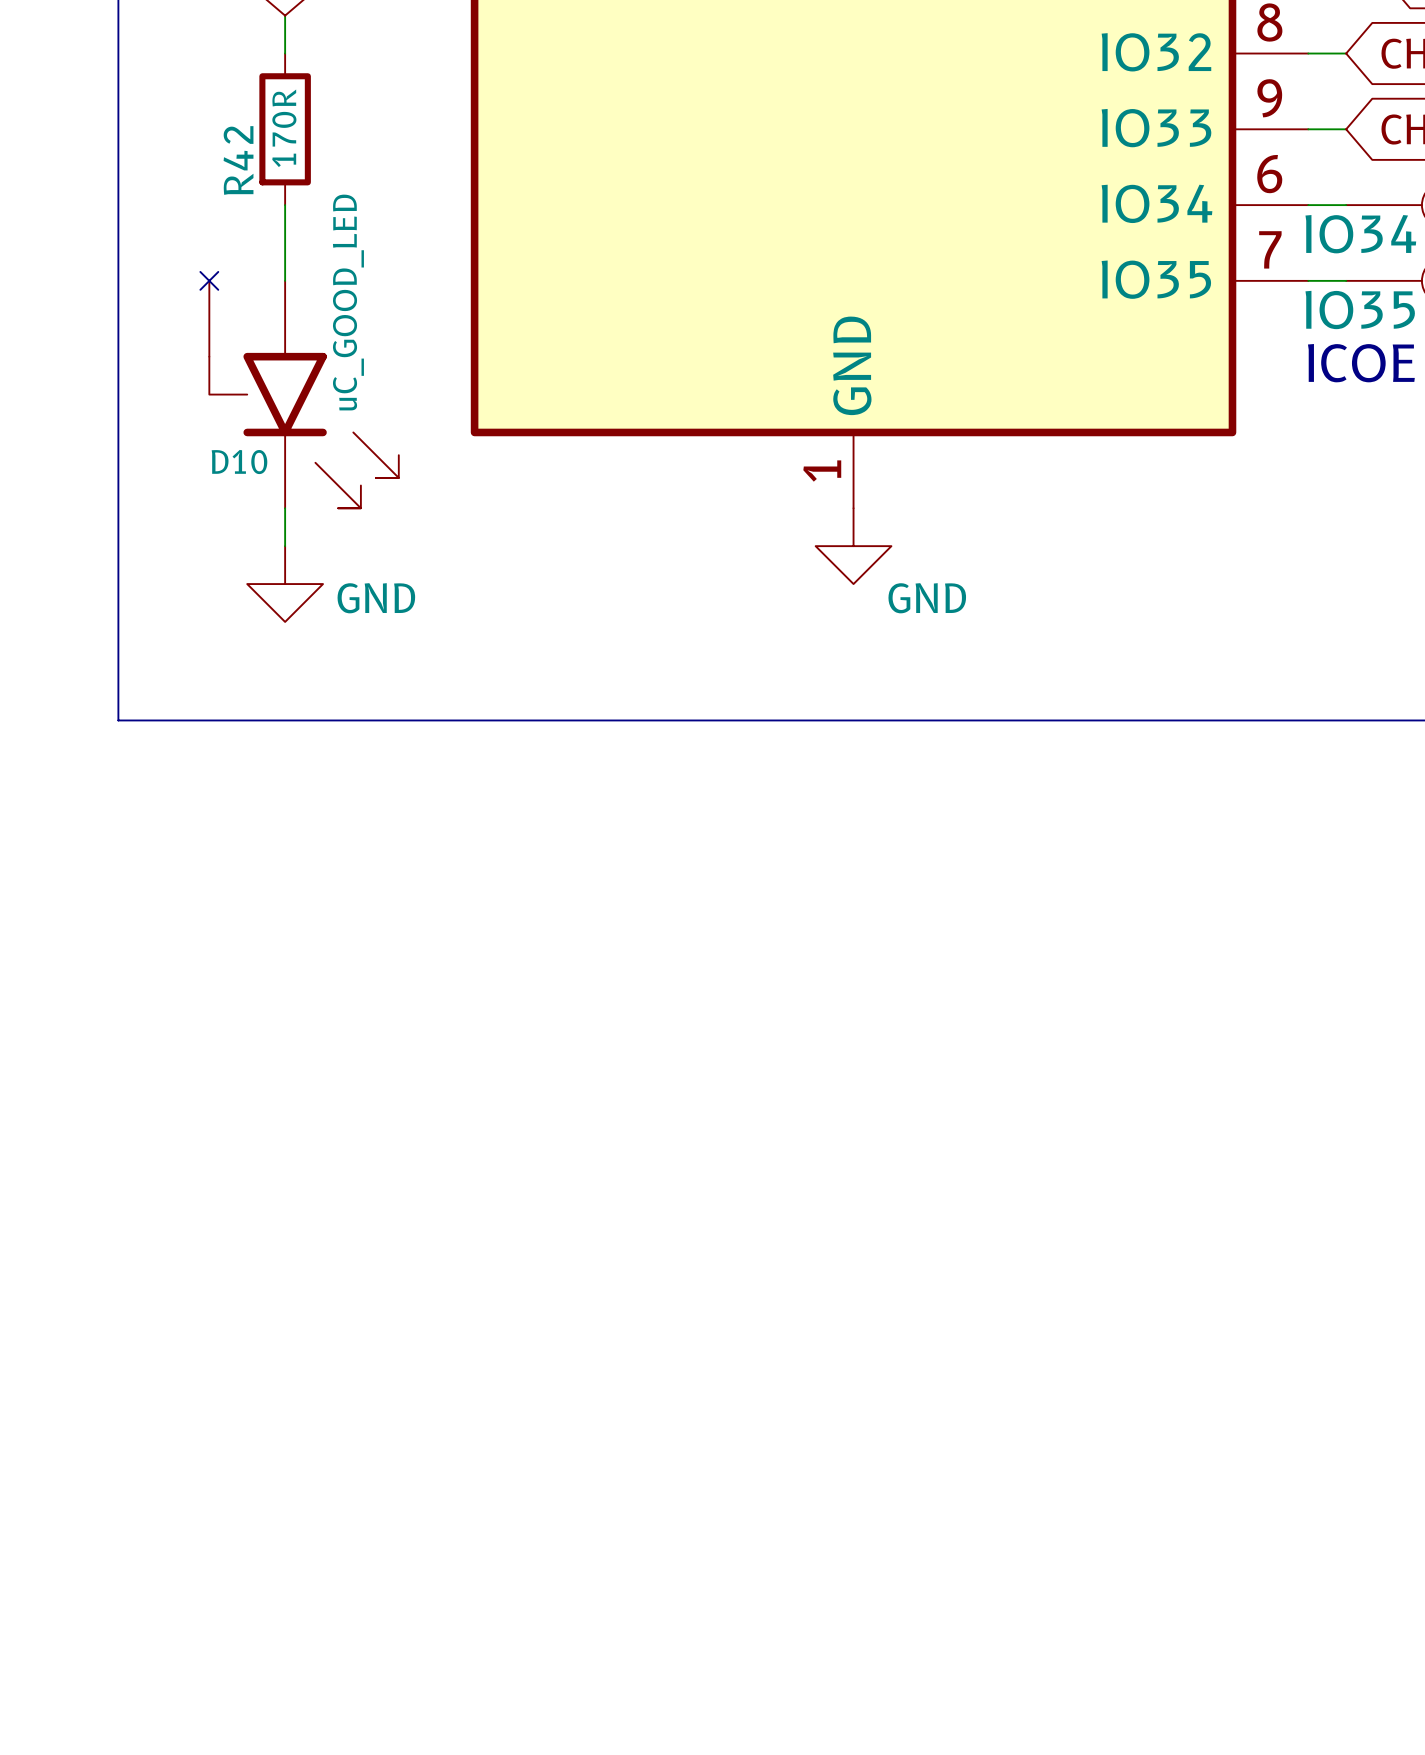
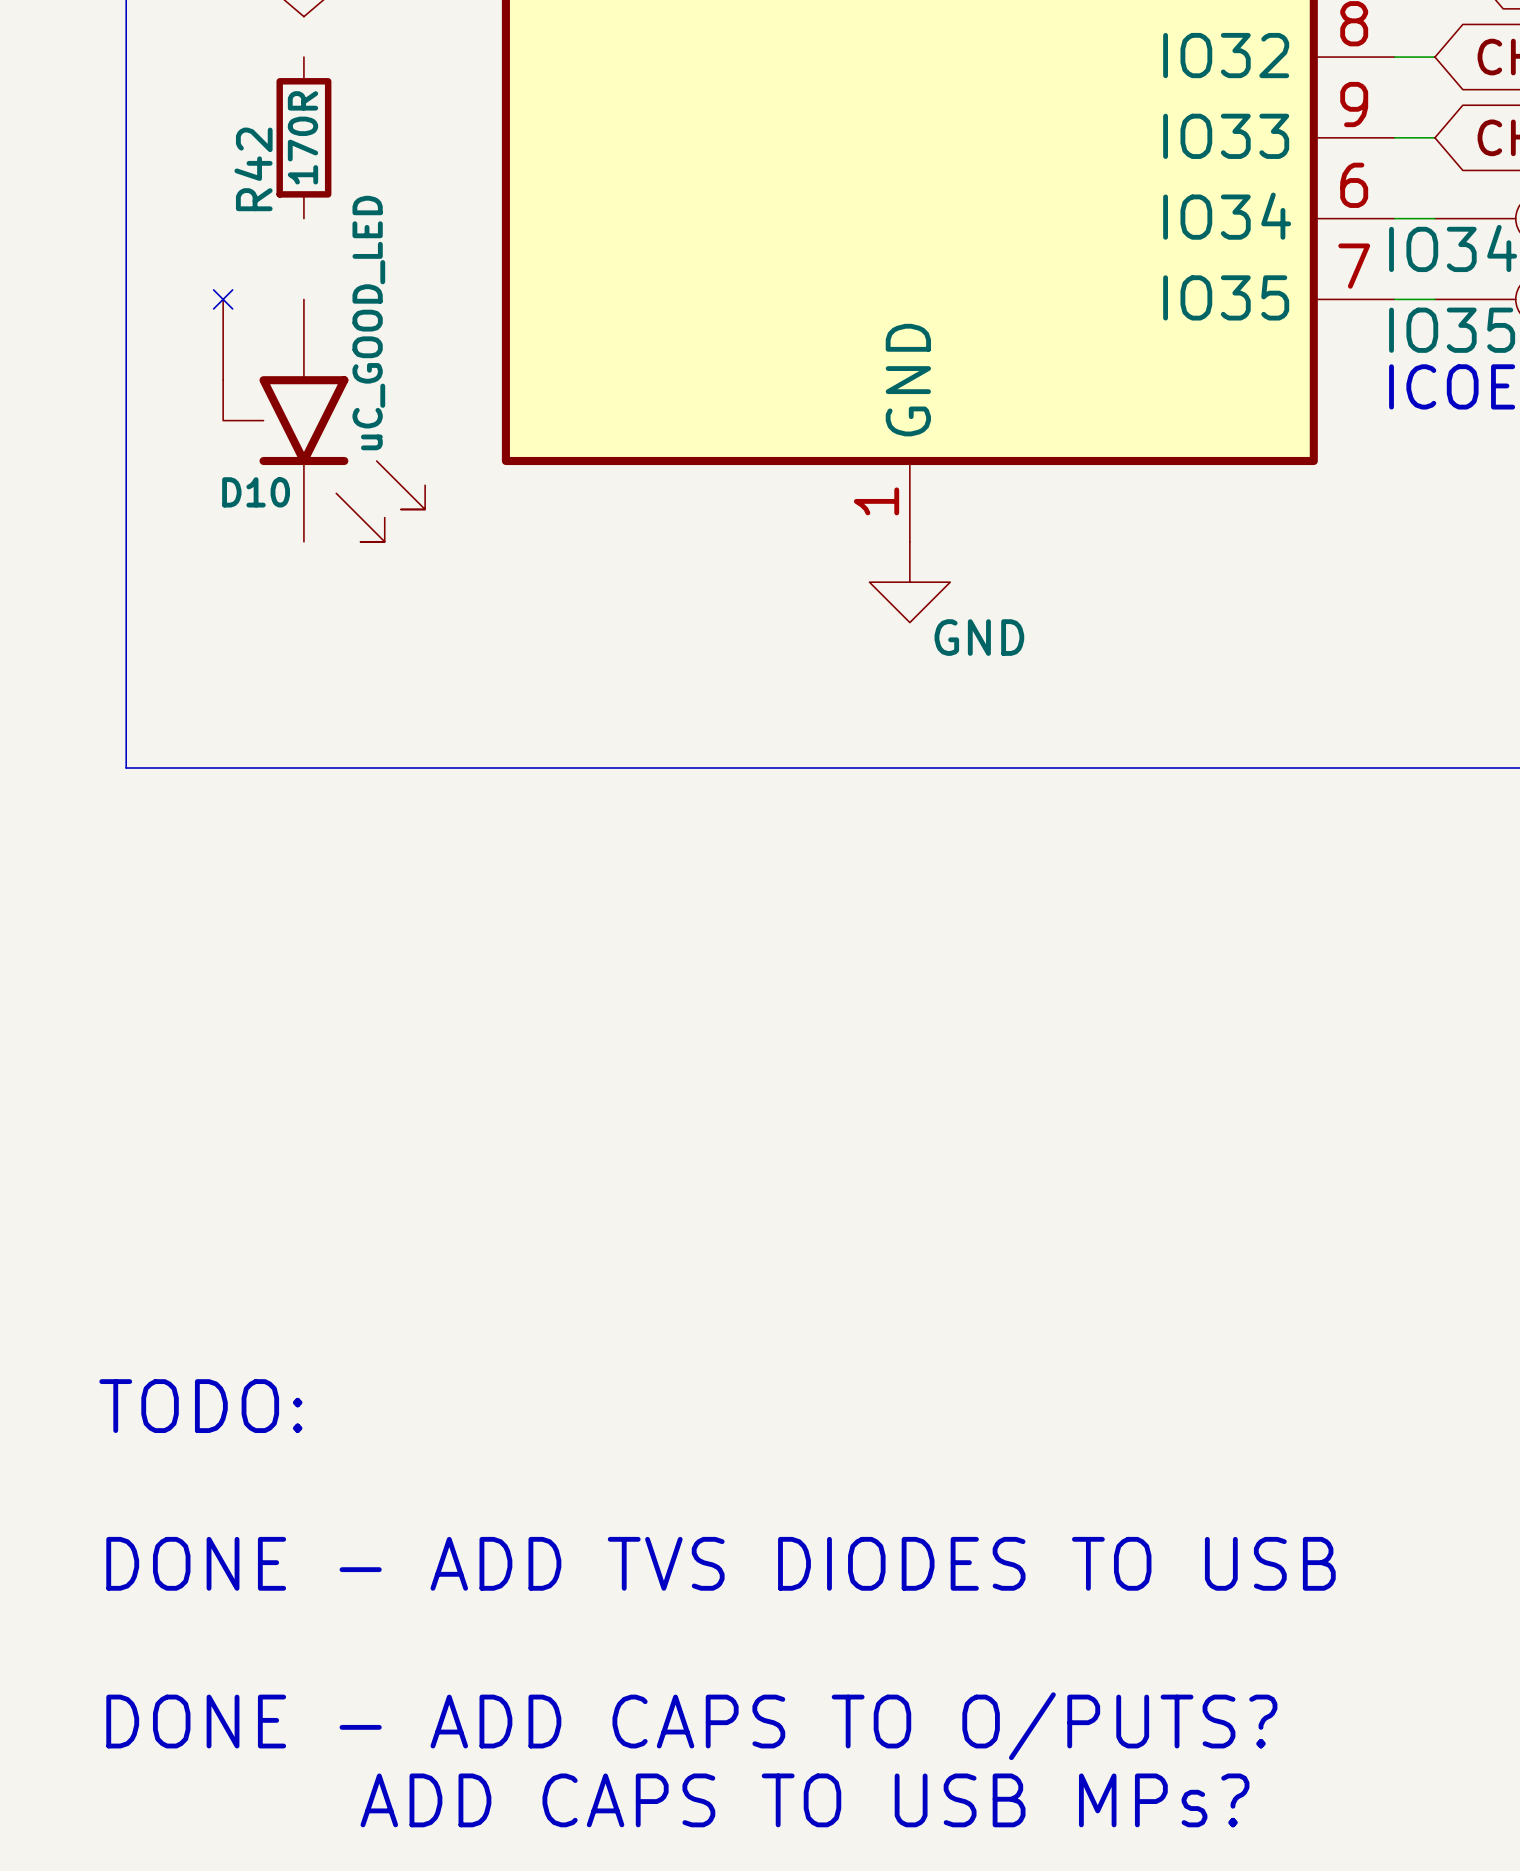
wire: (285, 15) (285, 53) -> none
wire: (285, 205) (285, 280) -> none
wire: (285, 508) (285, 546) -> none
power symbol: GND (285, 584) -> none
text: none -> TODO: (200, 1406)
text: none -> DONE - ADD TVS DIODES TO USB (721, 1563)
text: none -> DONE - ADD CAPS TO O/PUTS? (691, 1726)
text: none -> ADD CAPS TO USB MPs? (804, 1800)

